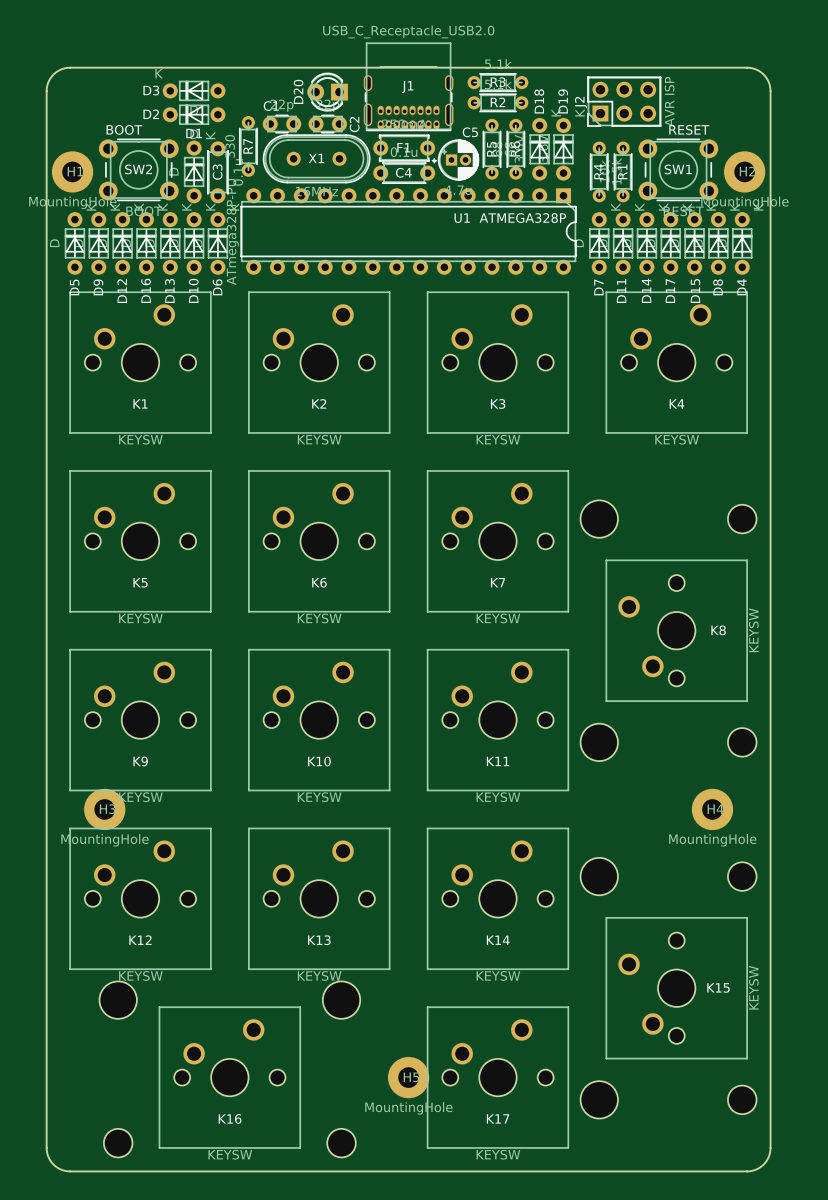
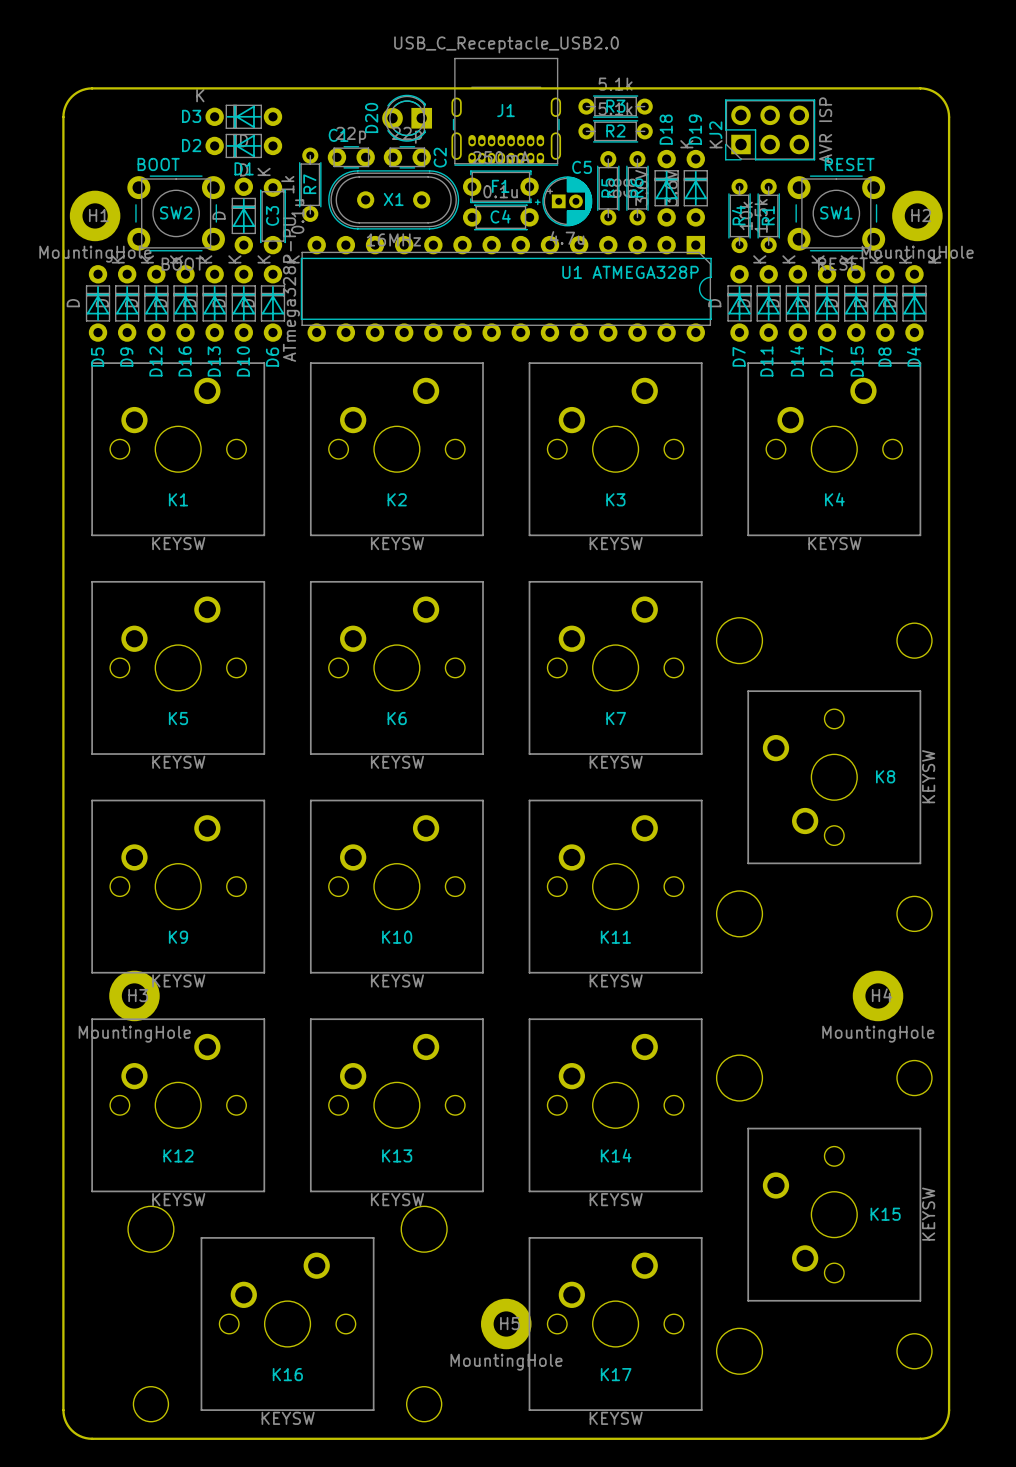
R7 value: 330 (230, 146) -> 1k (287, 184)

